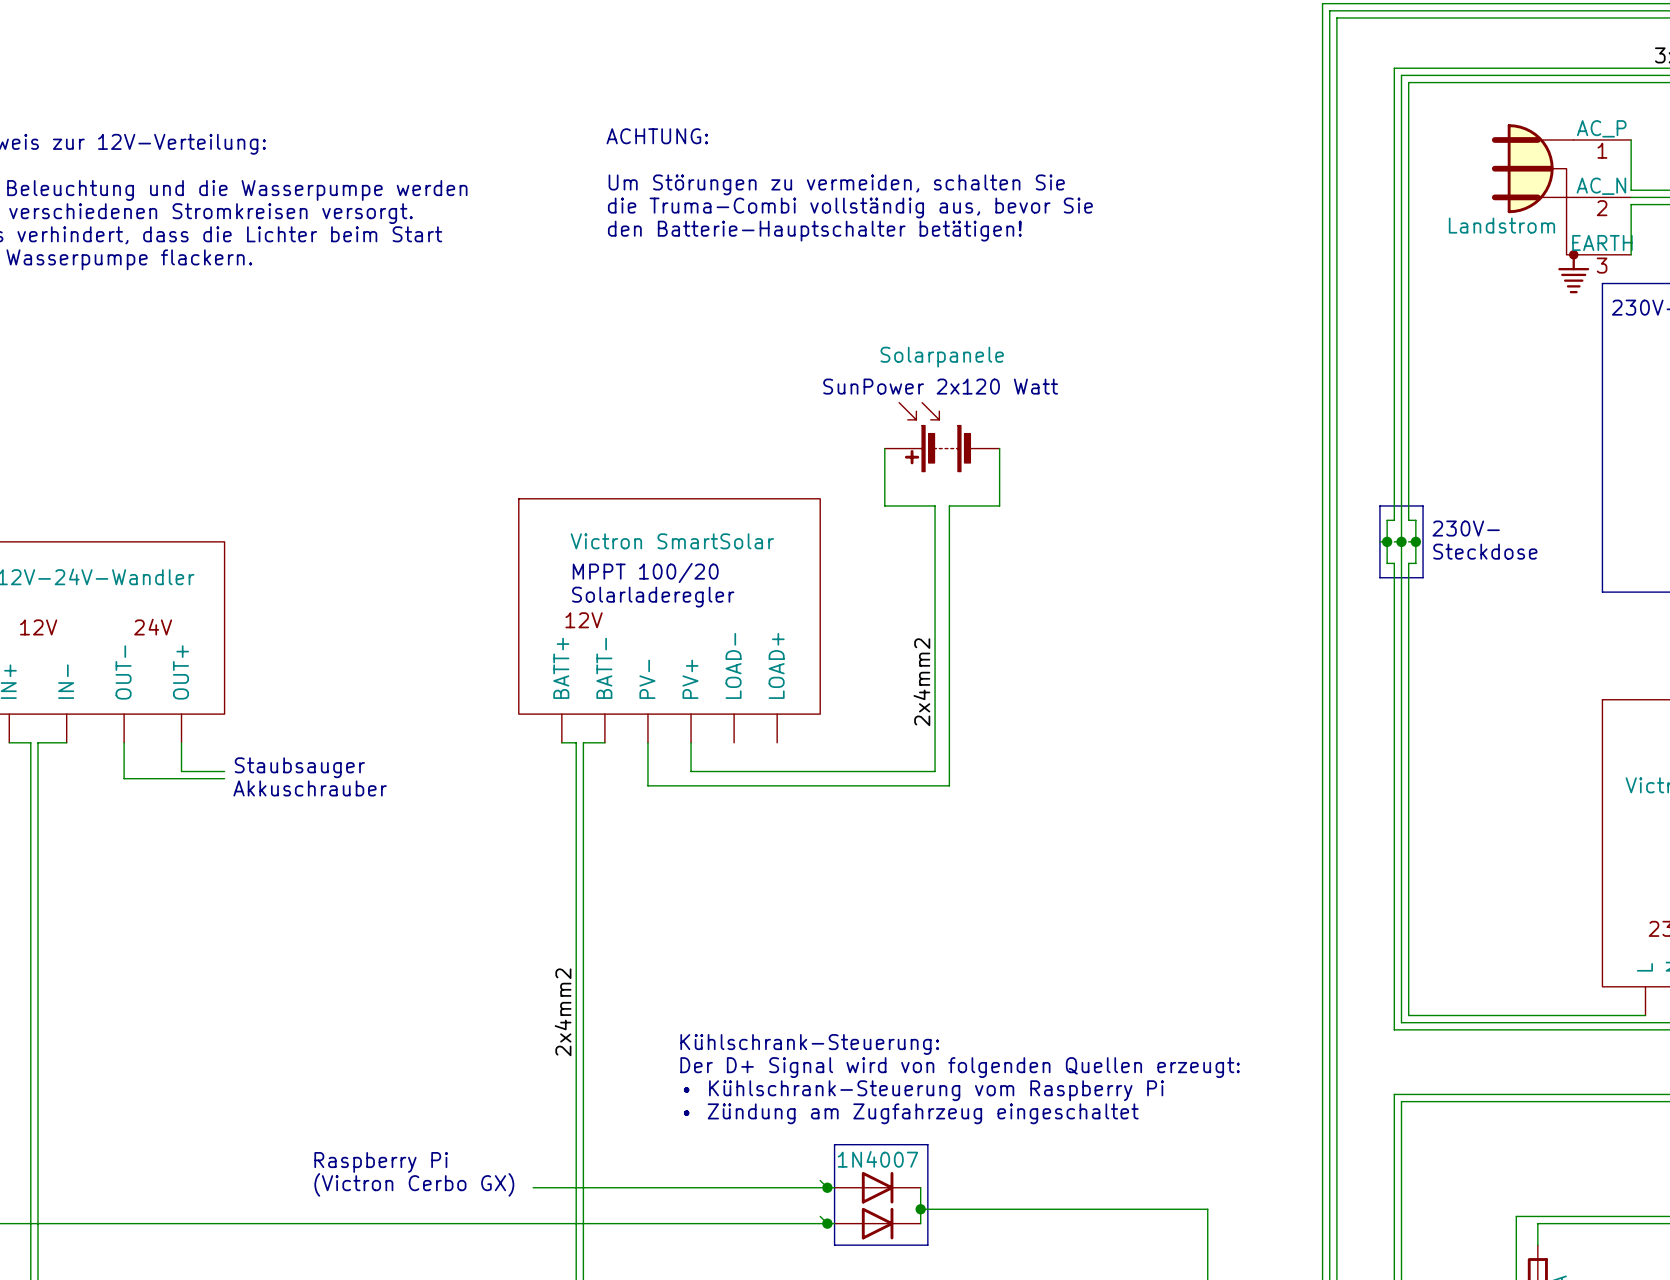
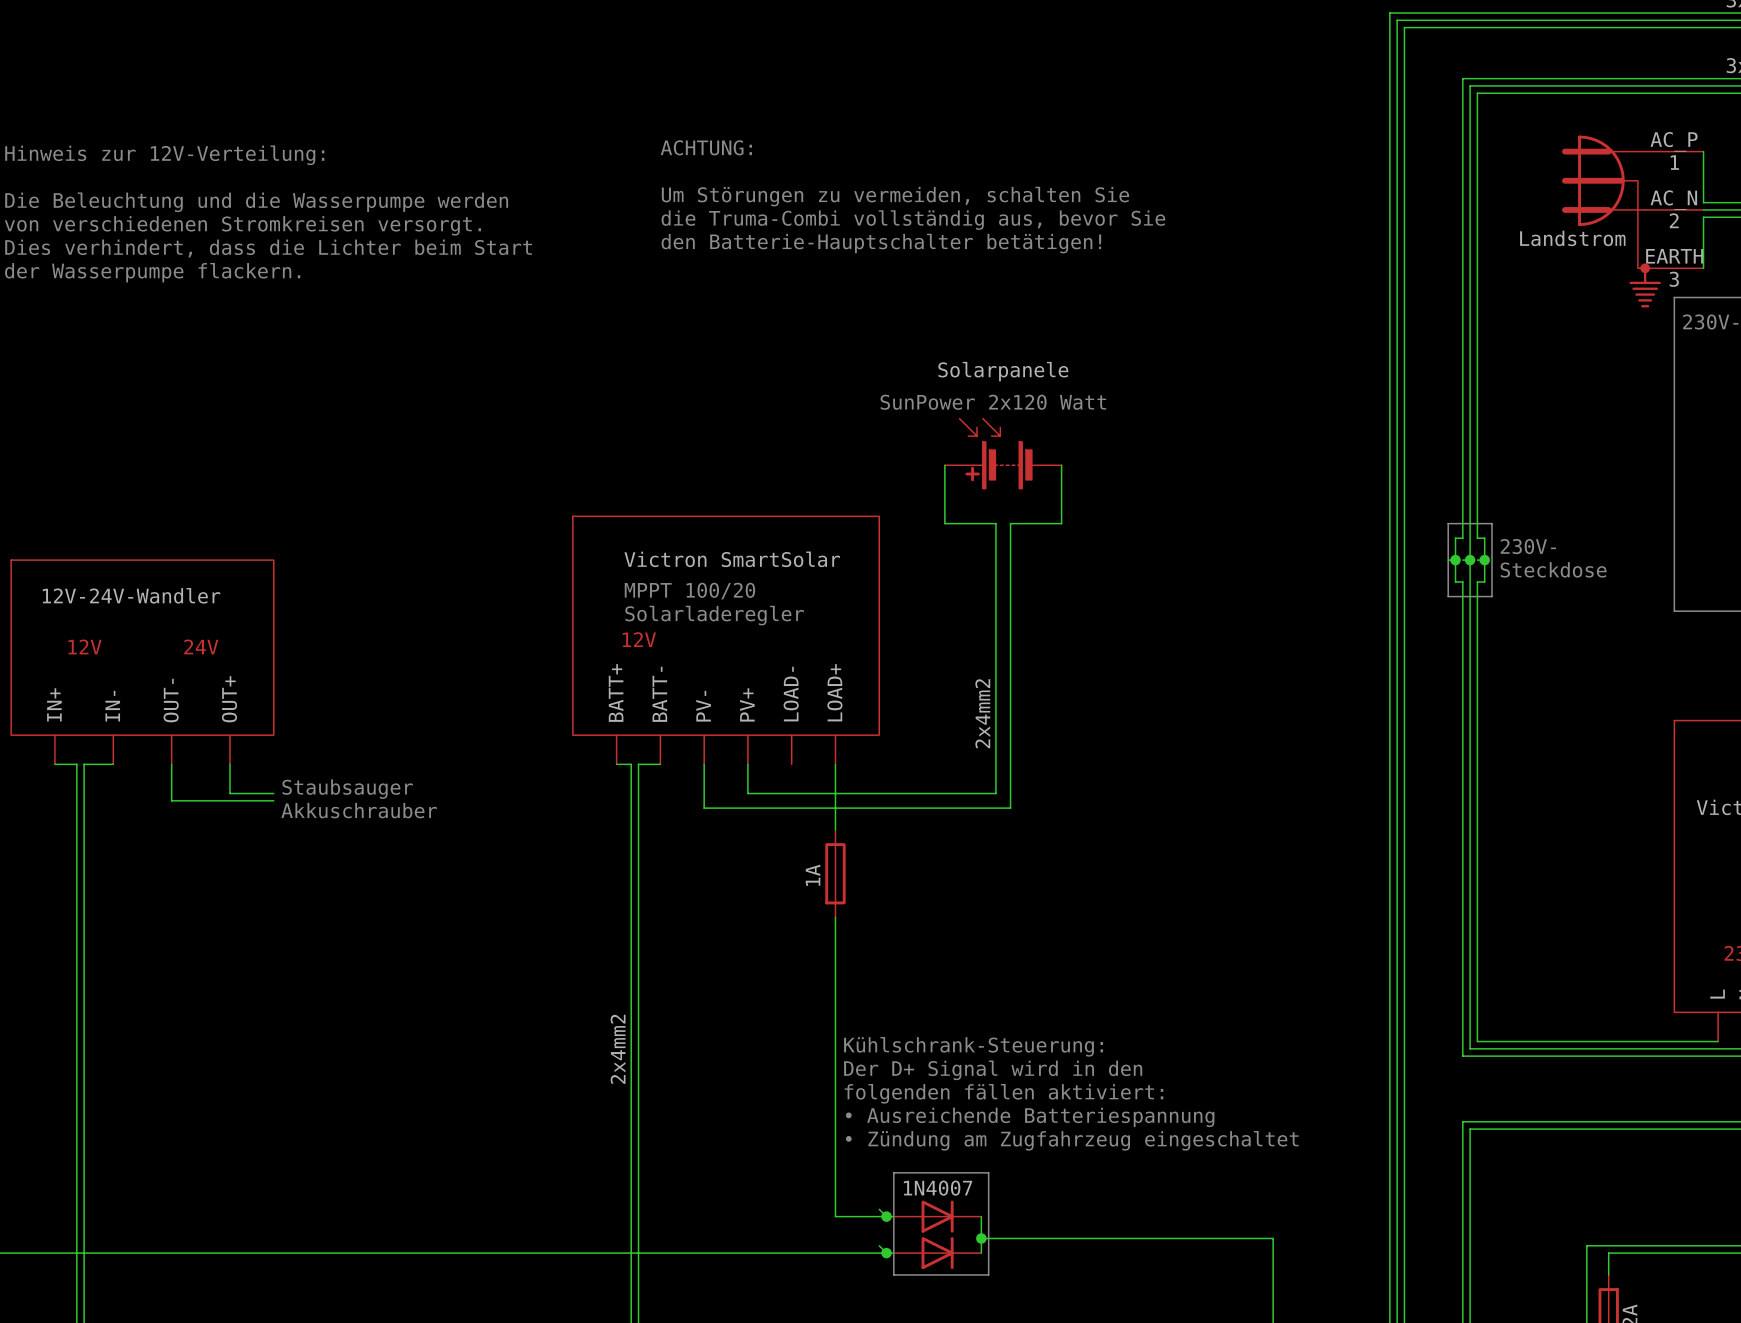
wire: none -> (835, 764) (835, 830)
part: none -> 1A (835, 873)
text position: Kühlschrank-Steuerung: (809, 1044) -> Kühlschrank-Steuerung: (973, 1046)
text: none -> folgenden fällen aktiviert: (1003, 1093)
text: Der D+ Signal wird von folgenden Quellen erzeugt: (960, 1067) -> Der D+ Signal wird in den (993, 1070)
text: • Kühlschrank-Steuerung vom Raspberry Pi (923, 1090) -> none
text: none -> • Ausreichende Batteriespannung (1030, 1117)
text position: • Zündung am Zugfahrzeug eingeschaltet (911, 1113) -> • Zündung am Zugfahrzeug eingeschaltet (1072, 1140)
text: Raspberry Pi (381, 1162) -> none
text: (Victron Cerbo GX) (414, 1184) -> none
wire: (533, 1187) (777, 1187) -> (835, 917) (835, 1216)

